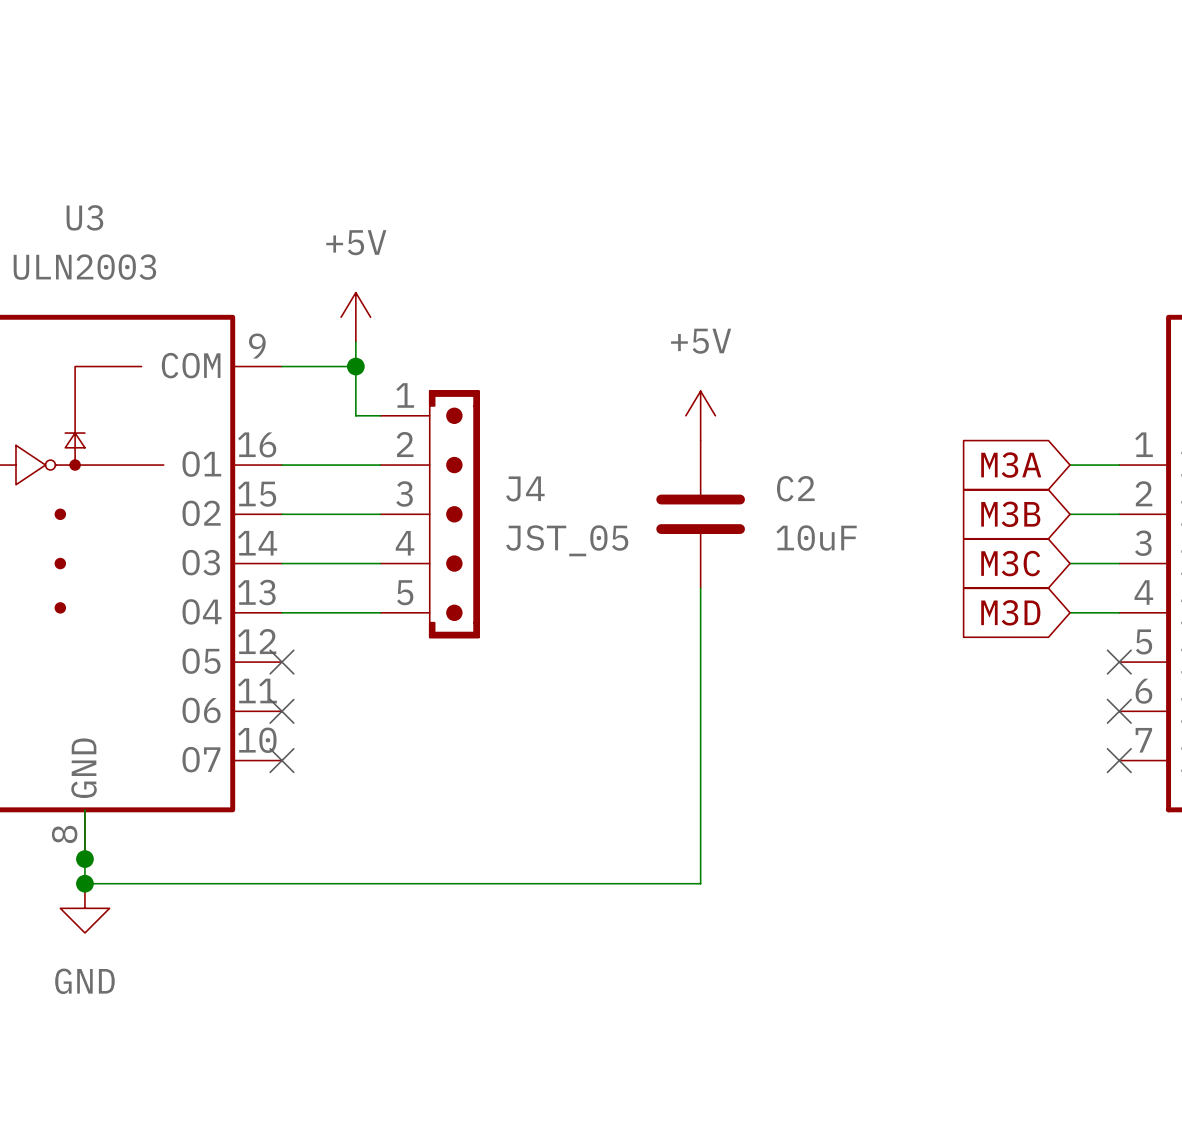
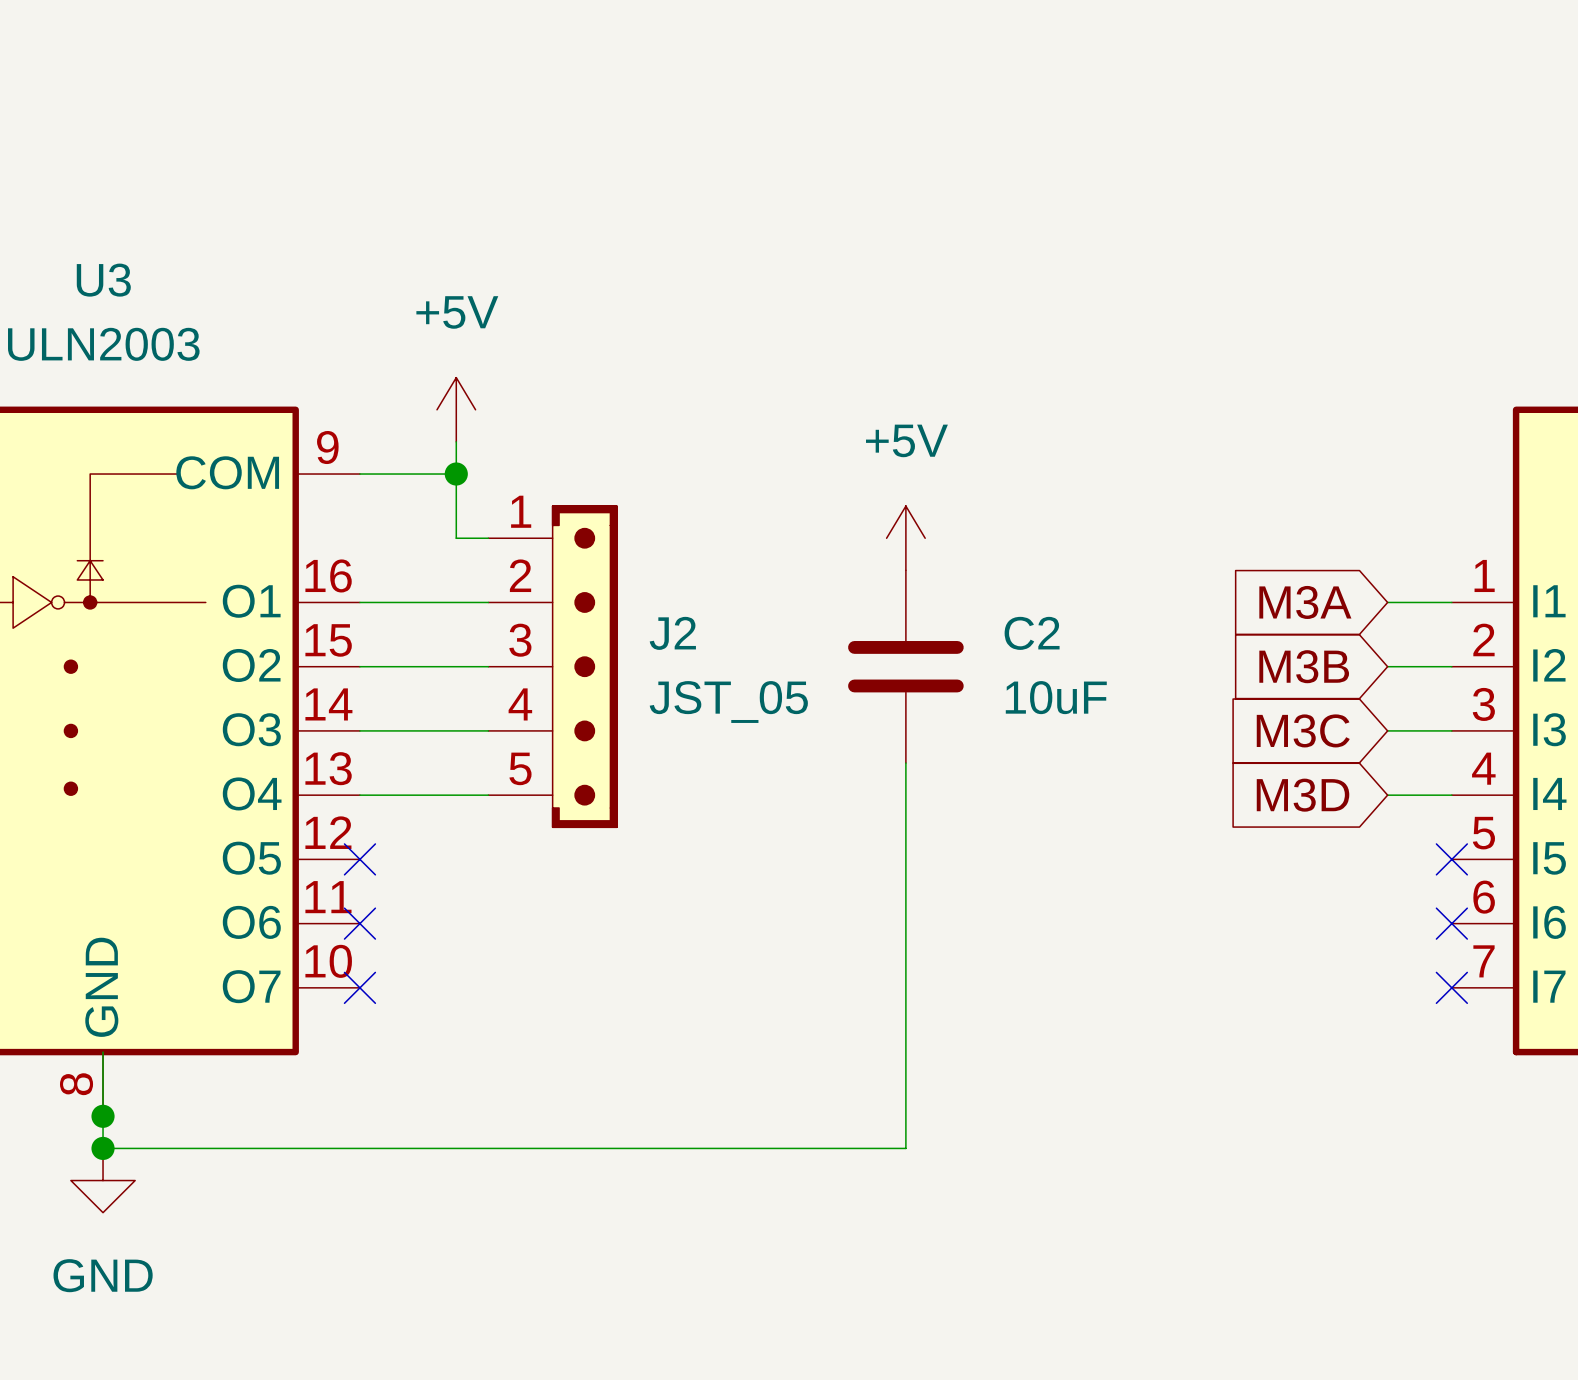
J4 name: J4 (525, 488) -> J2 (672, 633)

